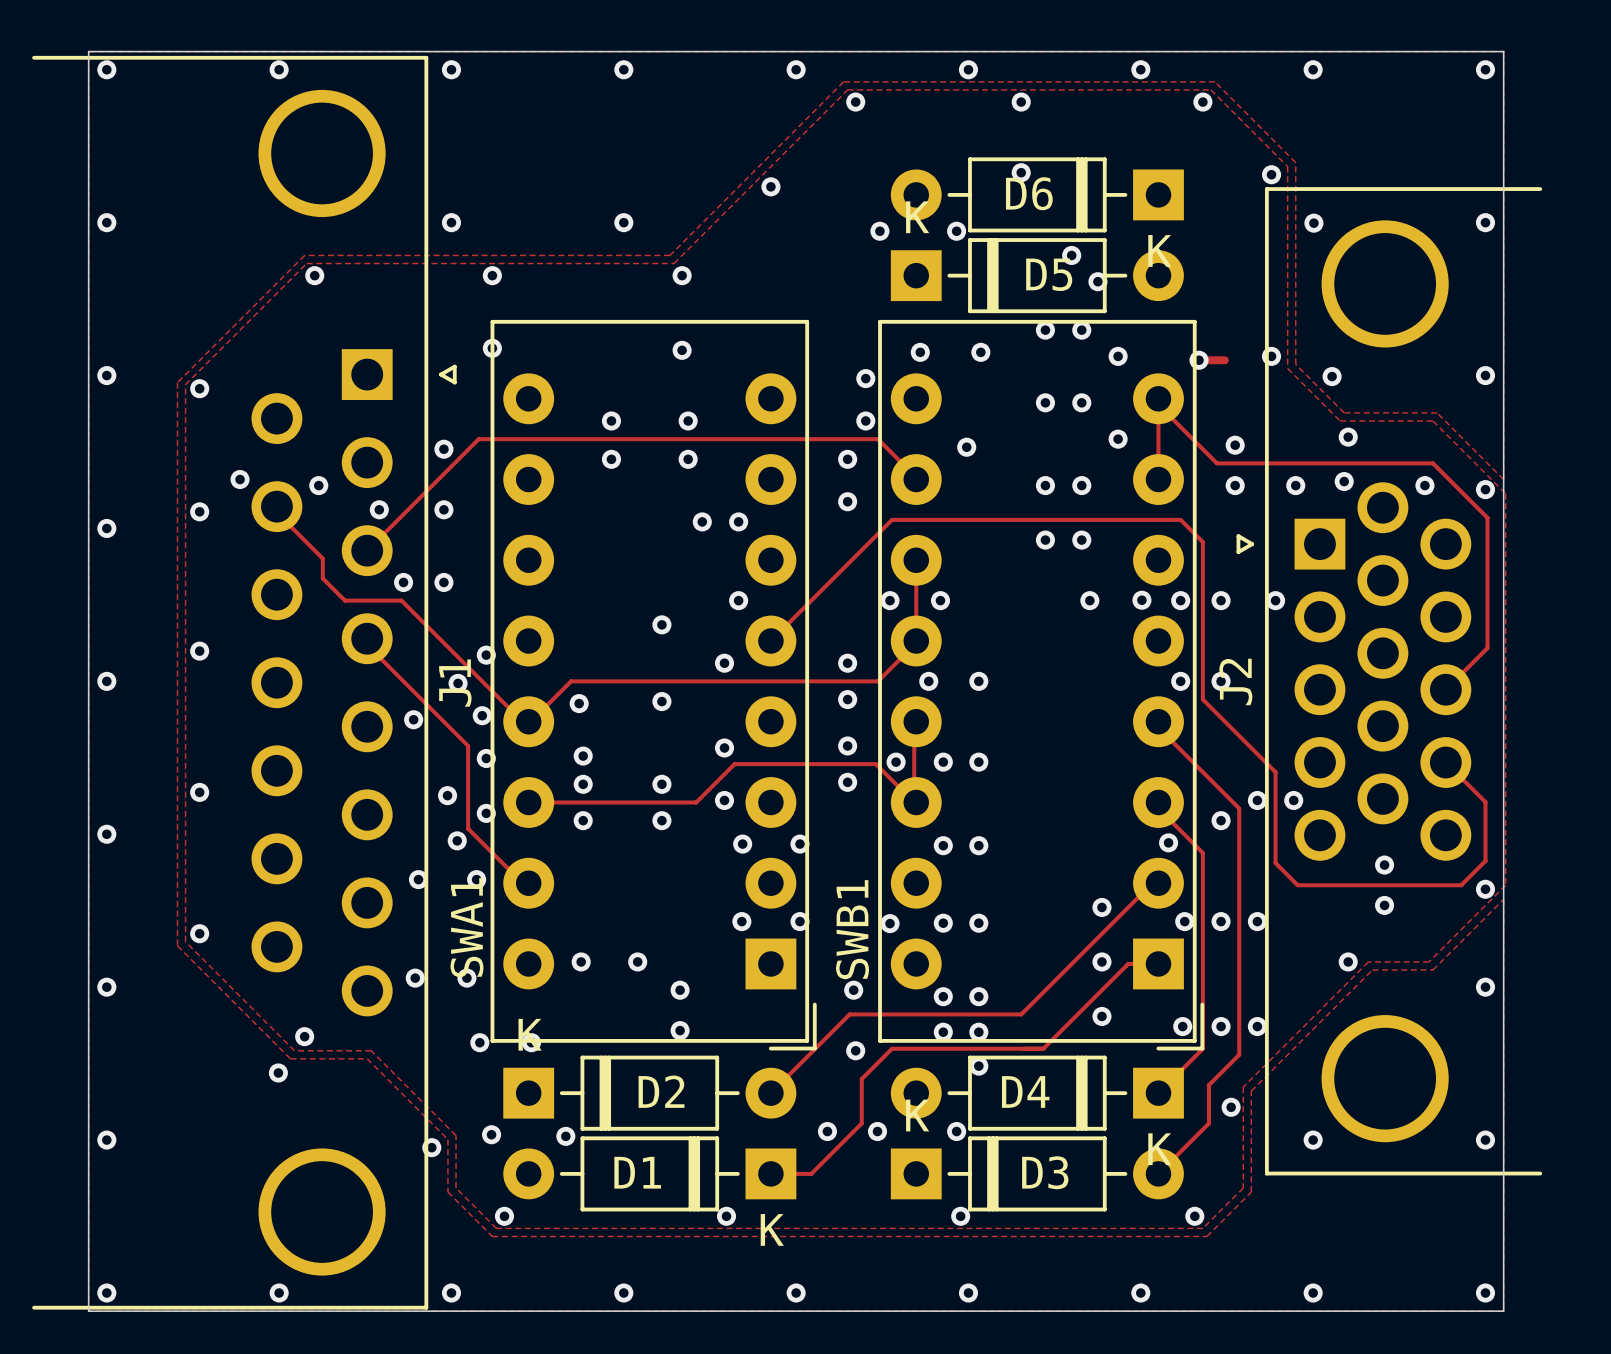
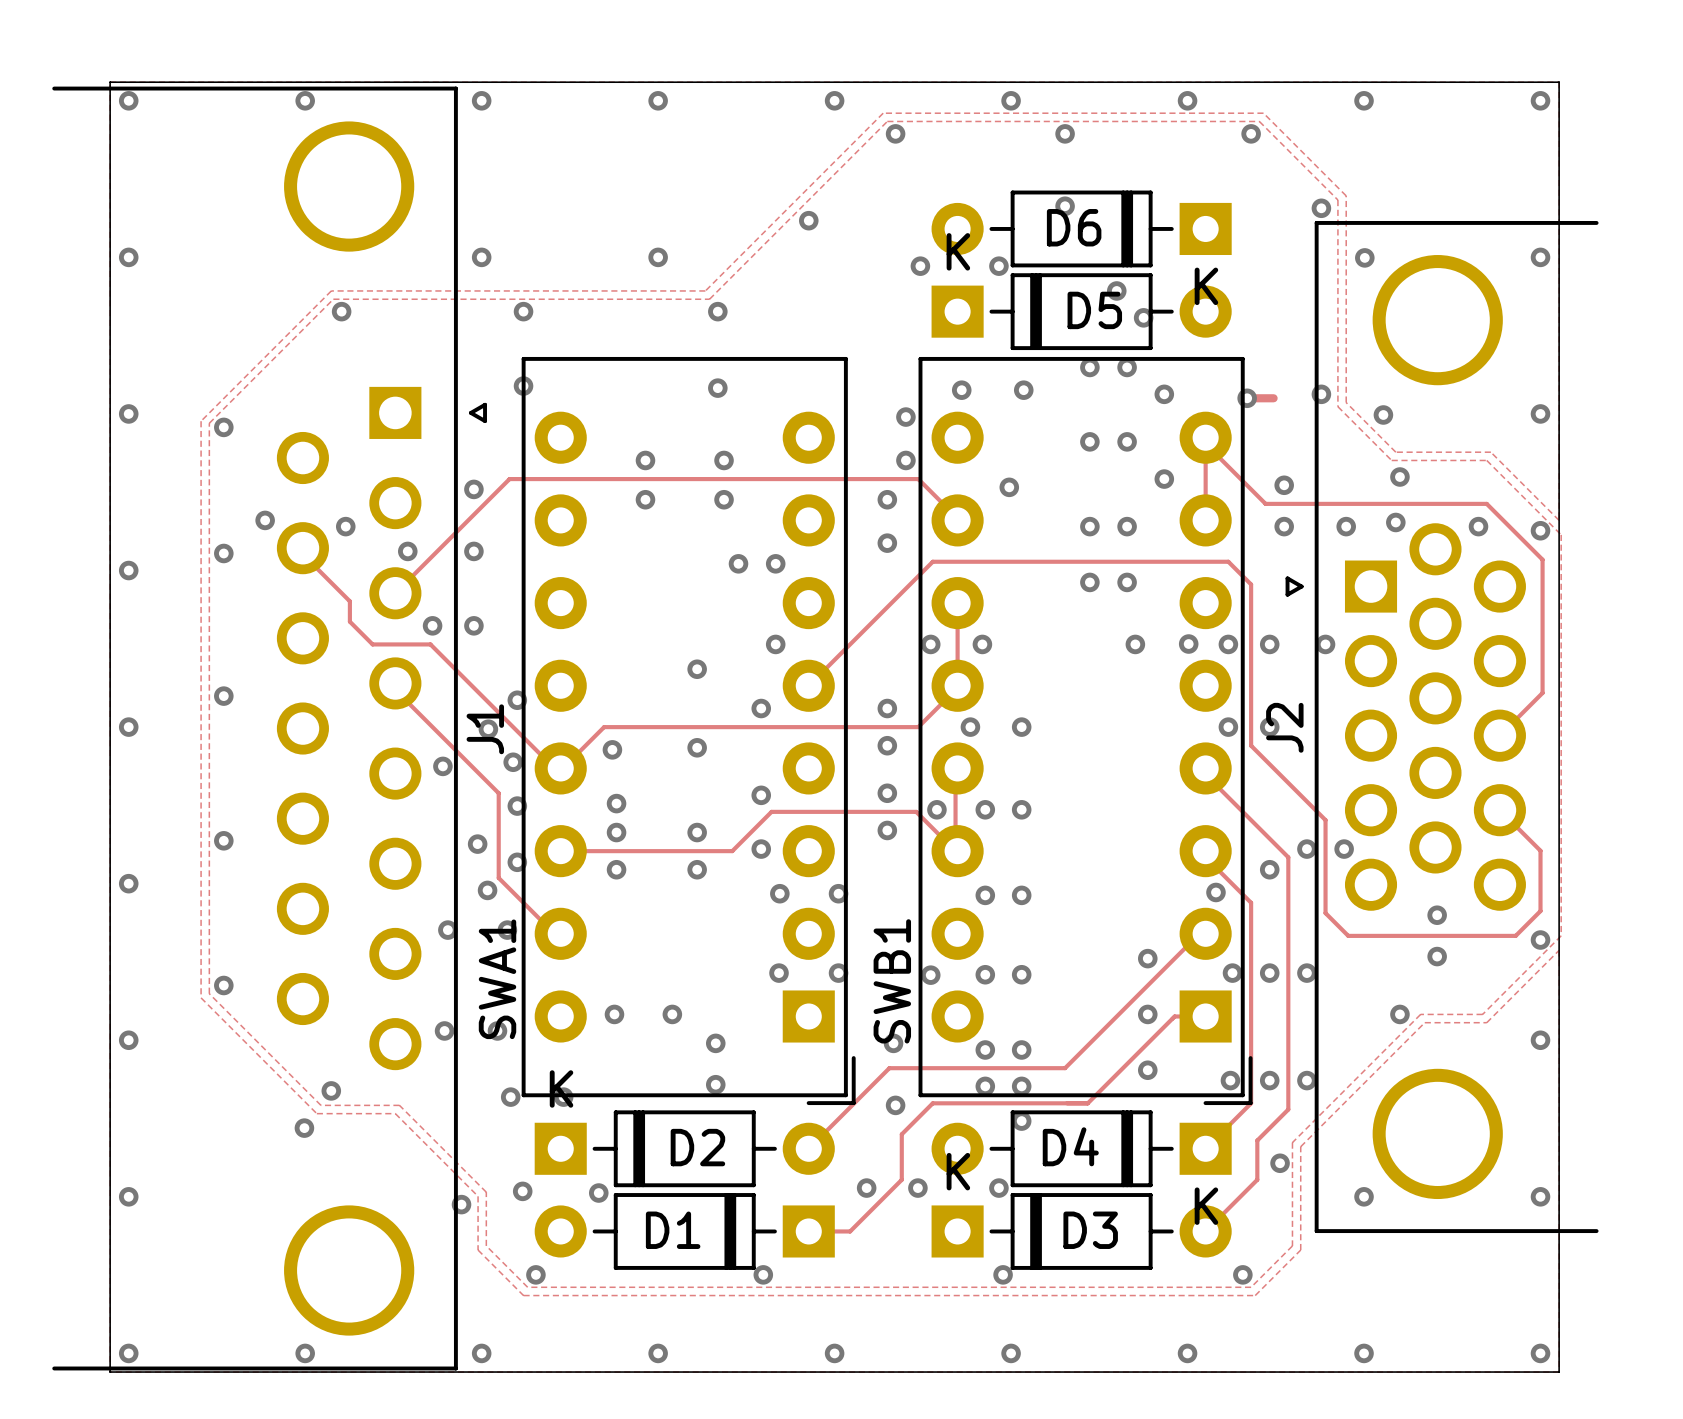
D1 text: K (772, 1229) -> none

